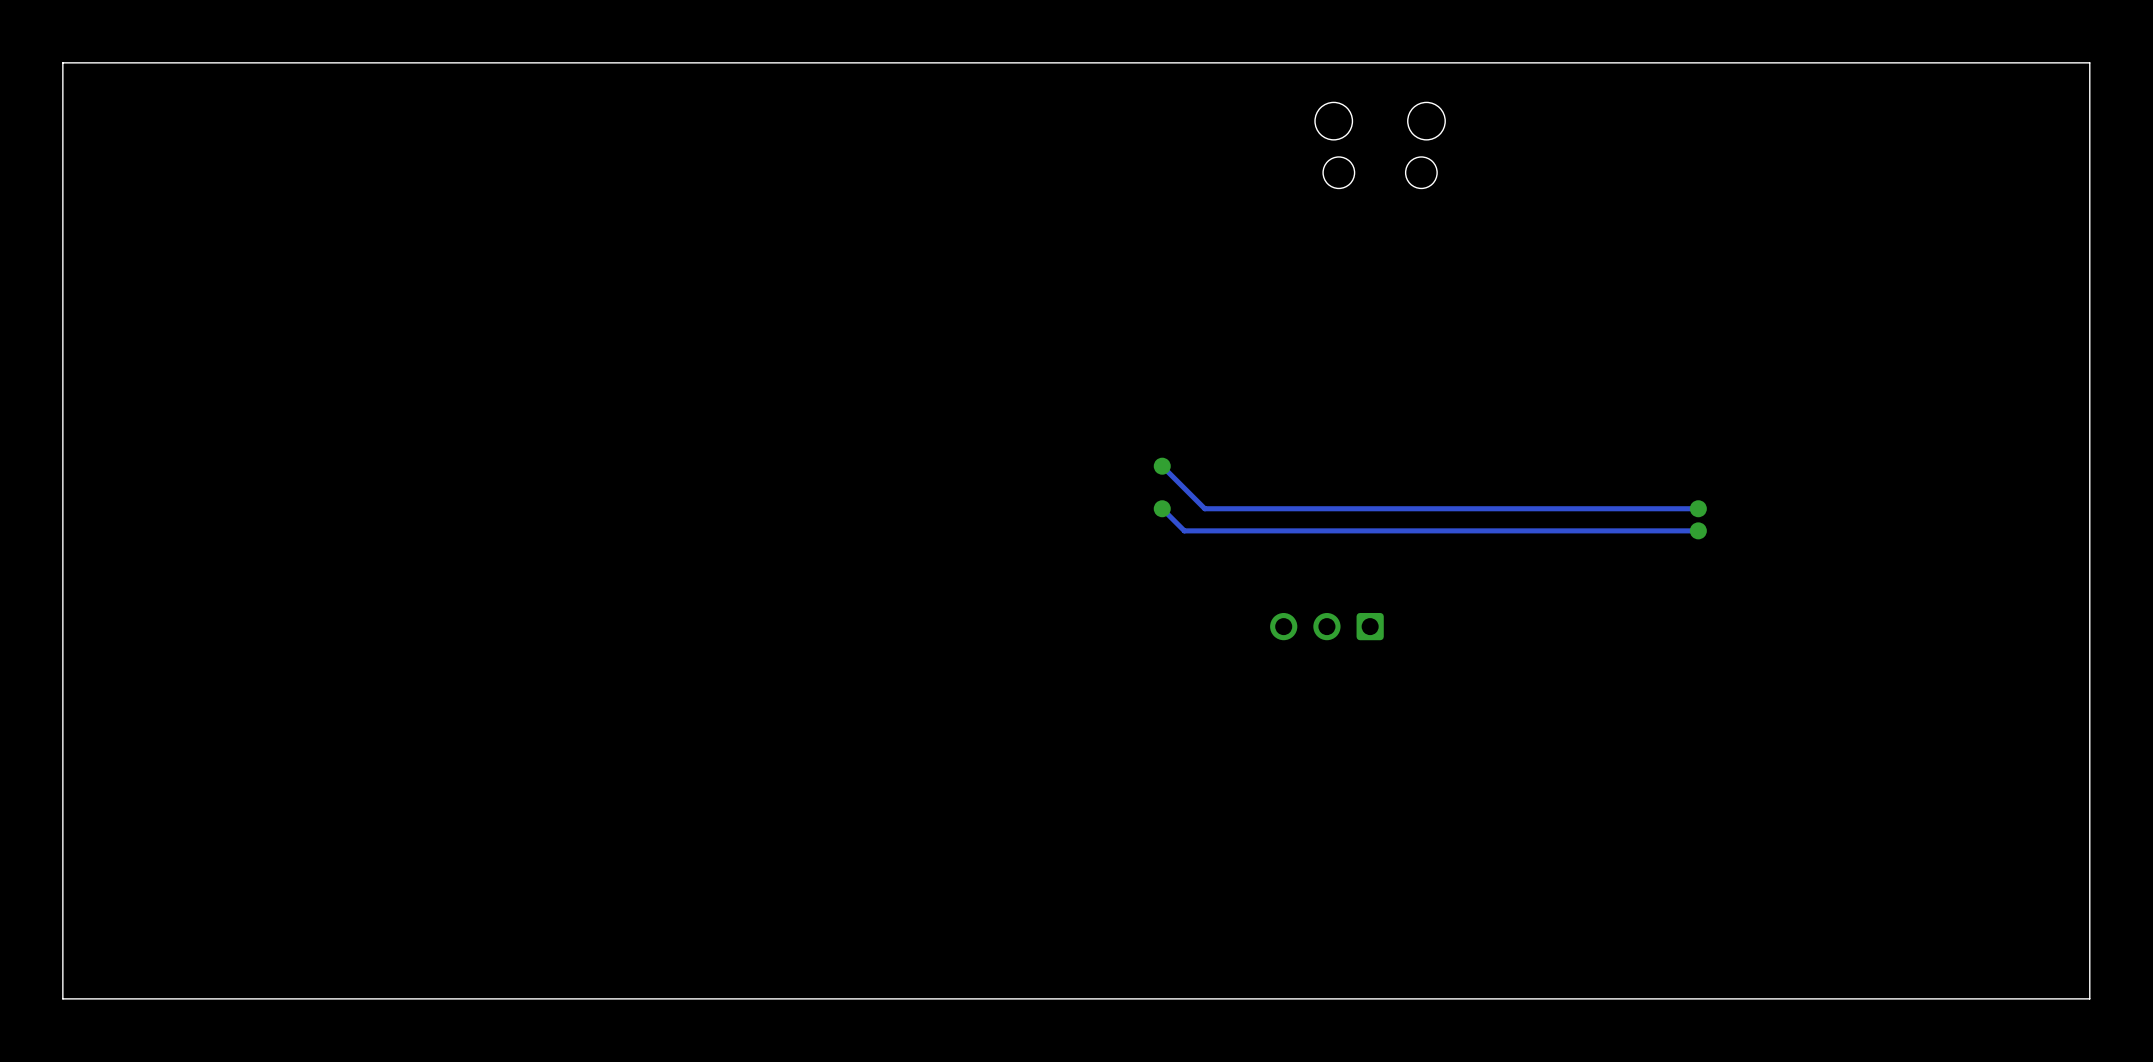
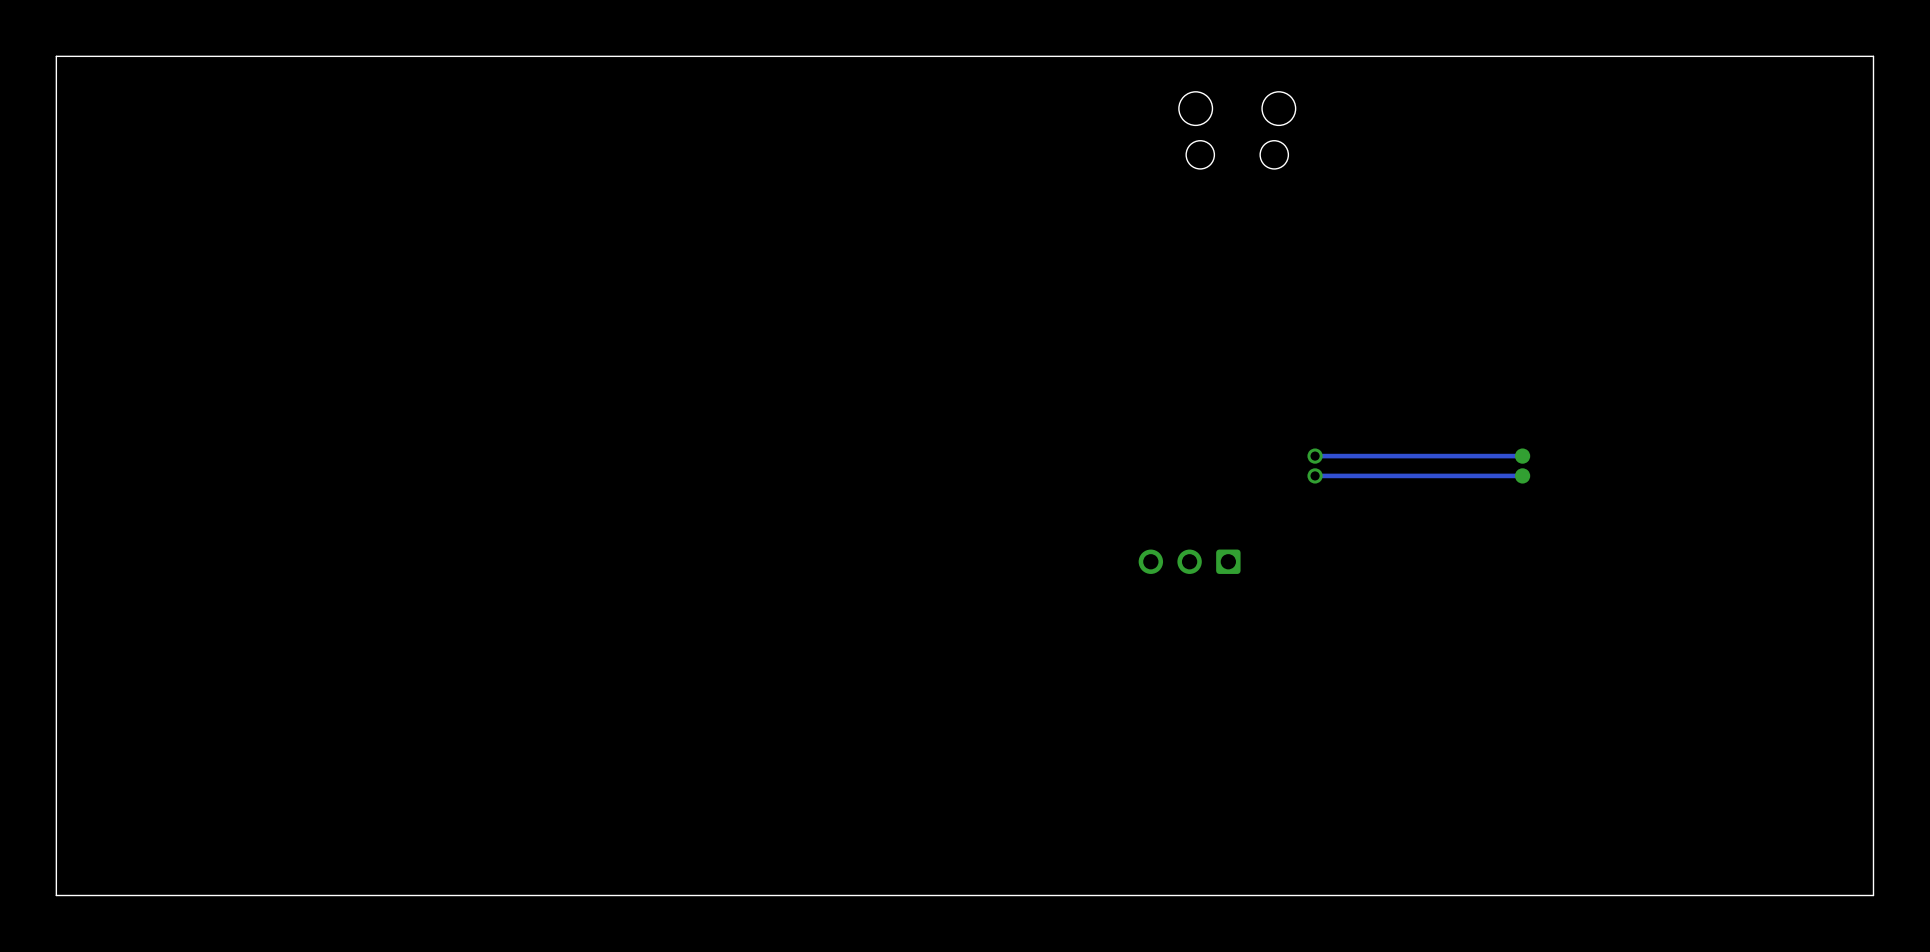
track: (1162, 466) (1204, 508) (1466, 508) -> none
via: (1162, 466) -> none
track: (1162, 508) (1184, 530) (1466, 530) -> none
via: (1162, 508) -> none
via: none -> (1315, 456)
via: none -> (1315, 475)

